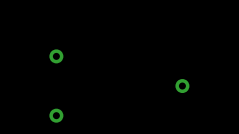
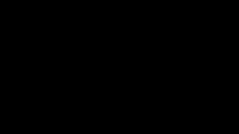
via: (56, 56) -> none
via: (182, 86) -> none
via: (56, 115) -> none

